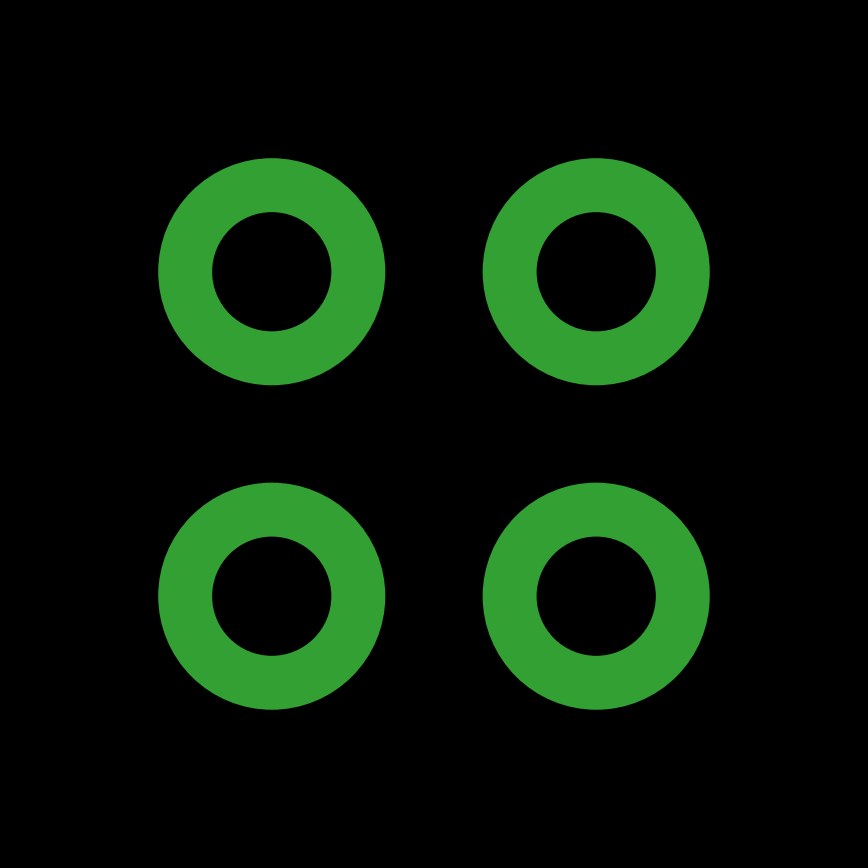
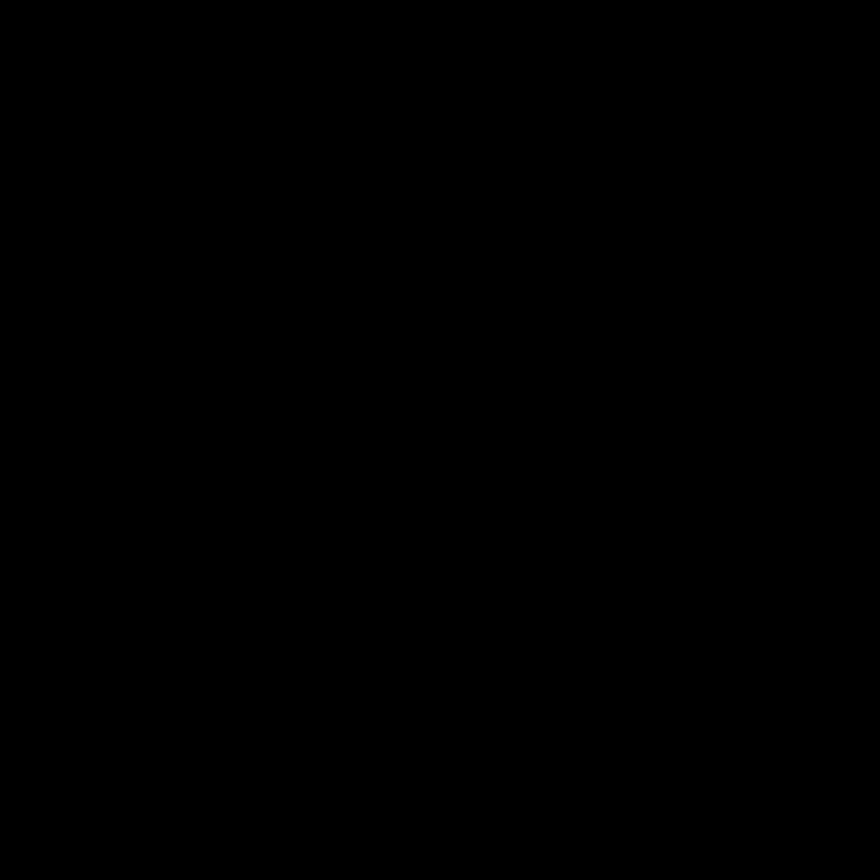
part: (271, 271) -> none
part: (596, 271) -> none
part: (271, 596) -> none
part: (596, 596) -> none

